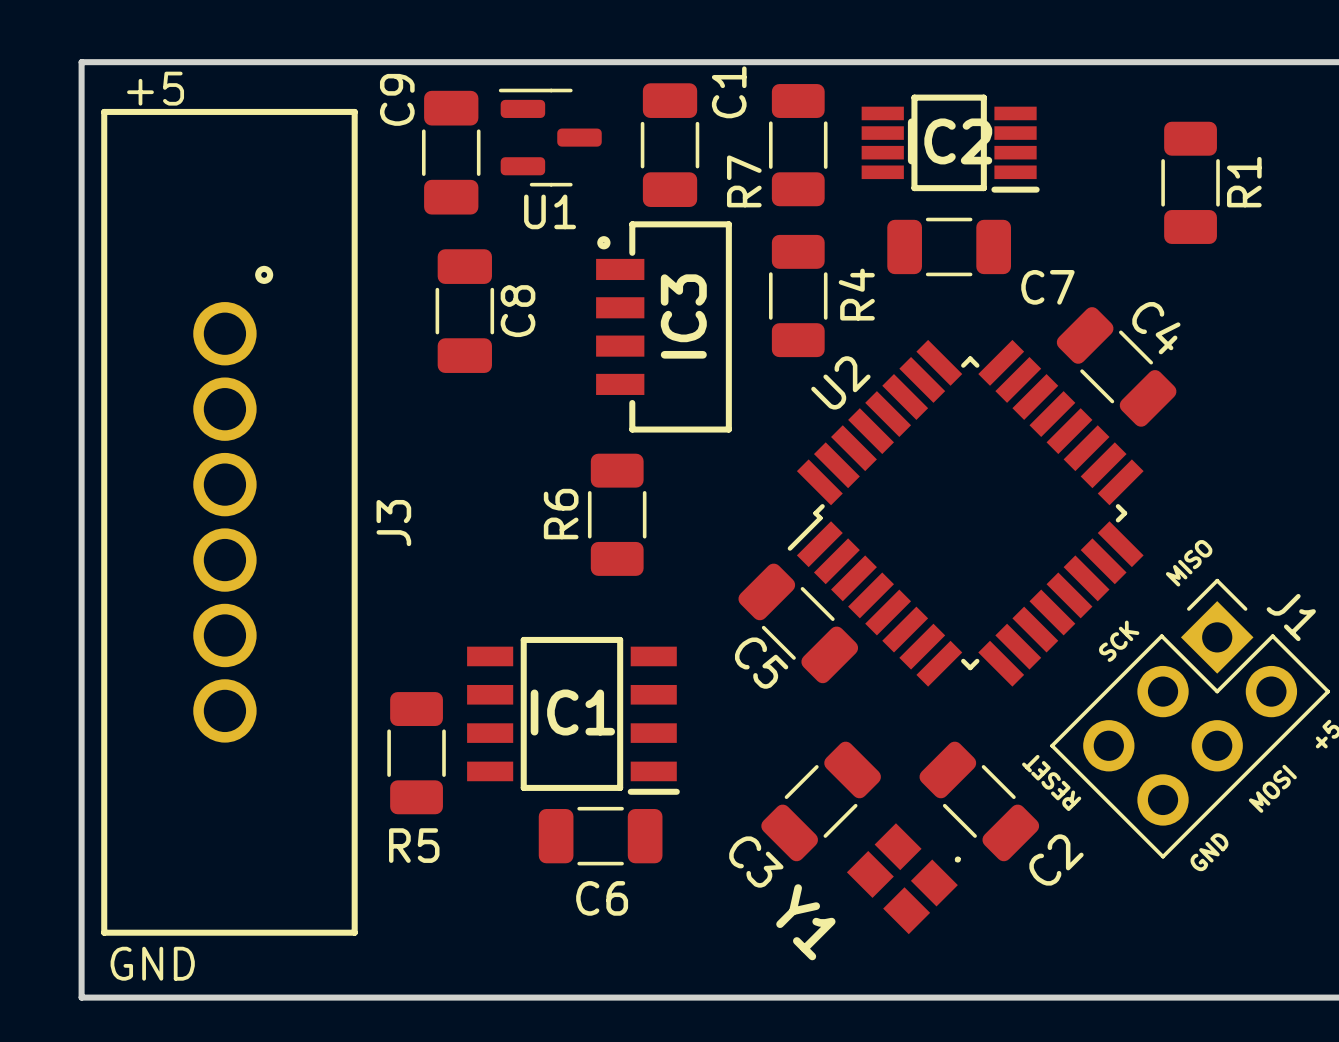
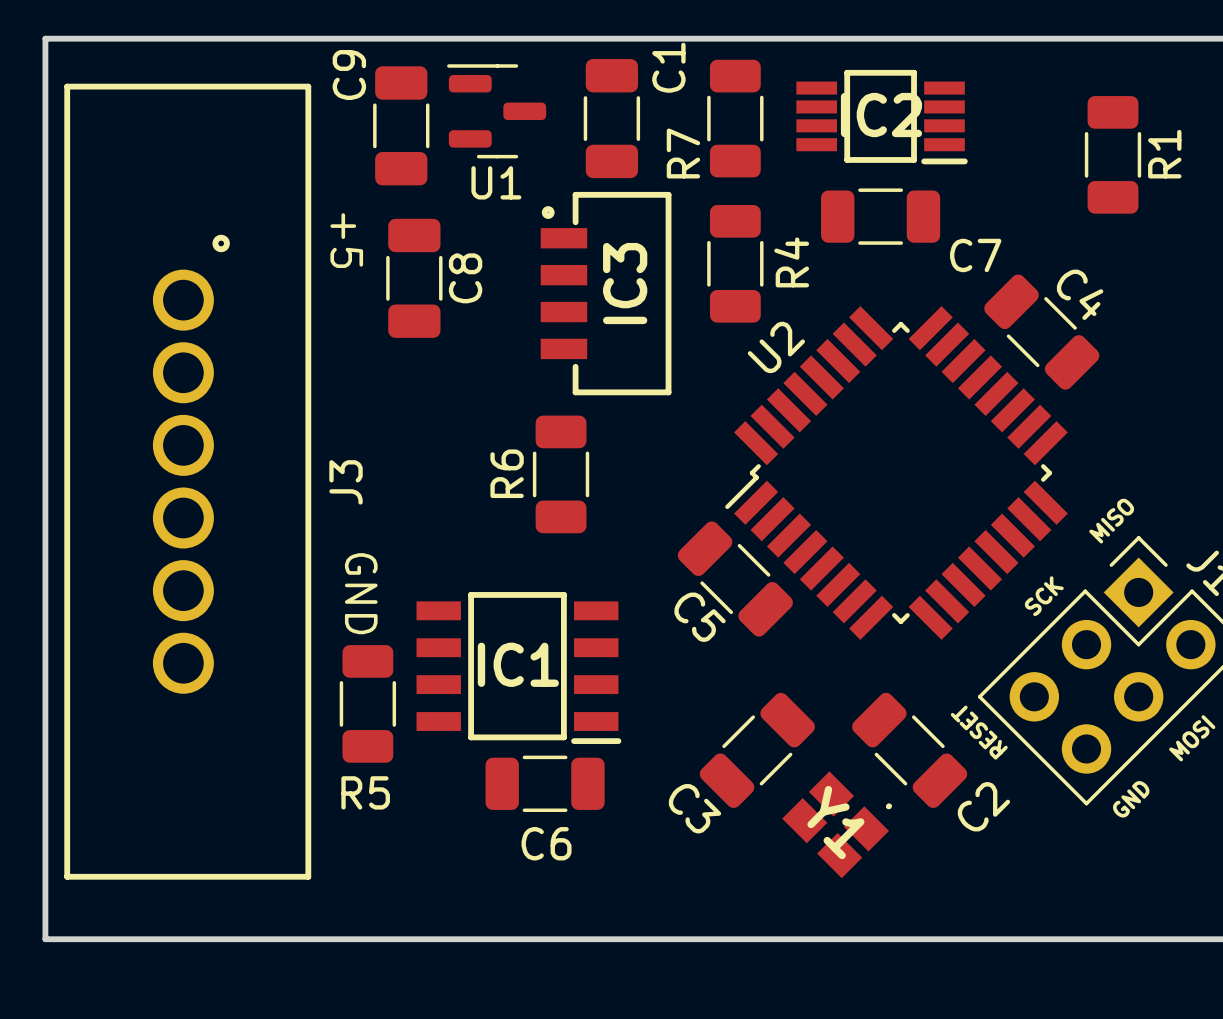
text rotation: 0° (155, 88) -> 90° clockwise (346, 240)
text position: +5 (155, 88) -> +5 (346, 240)
Y1 name position: Y1 (805, 922) -> Y1 (835, 822)
text rotation: 0° (152, 963) -> 90° clockwise (361, 593)
text position: GND (152, 963) -> GND (361, 593)

